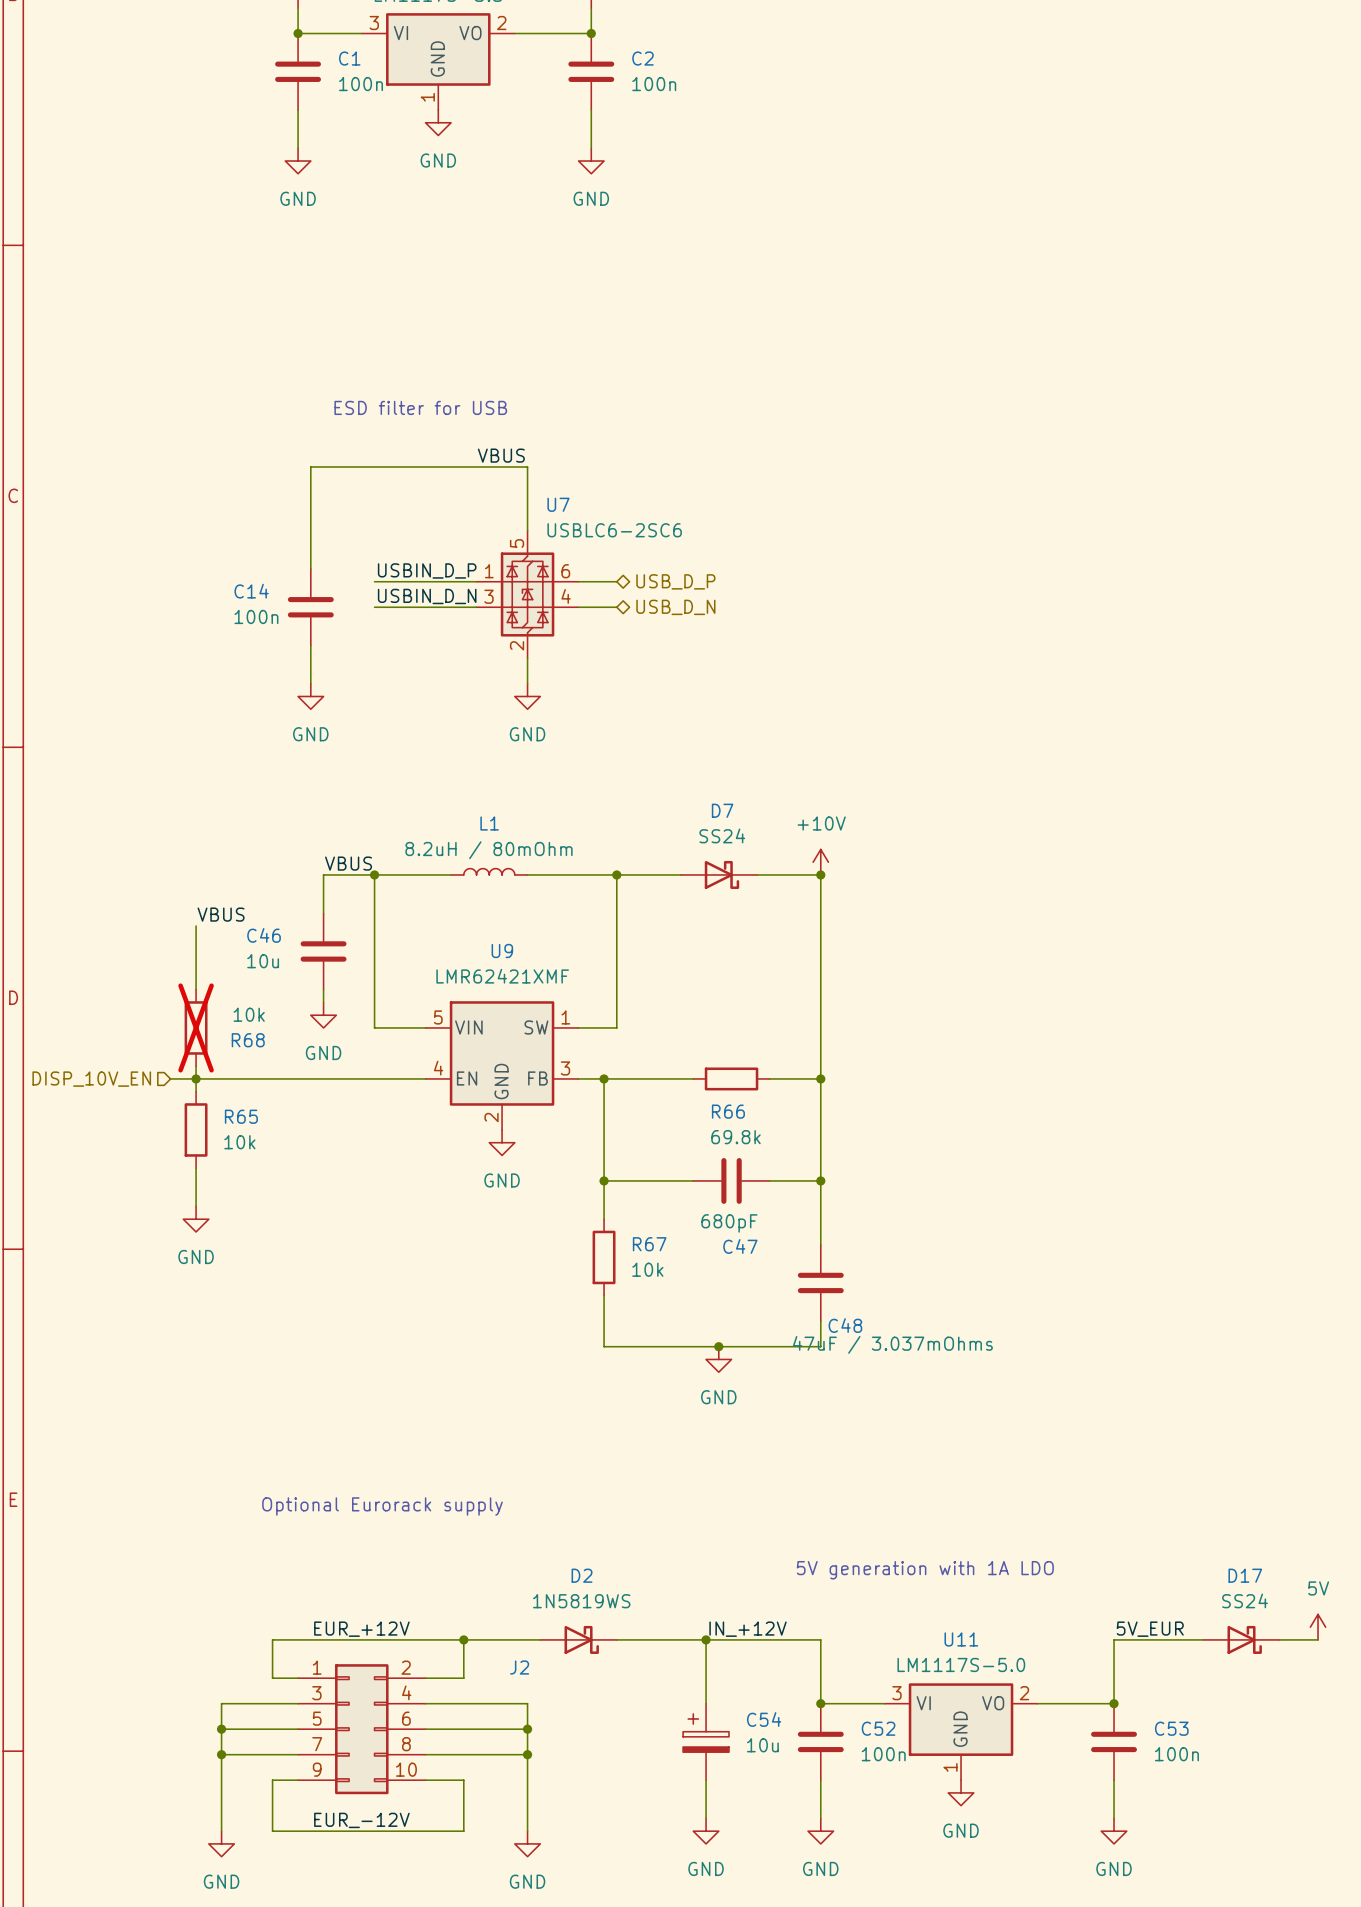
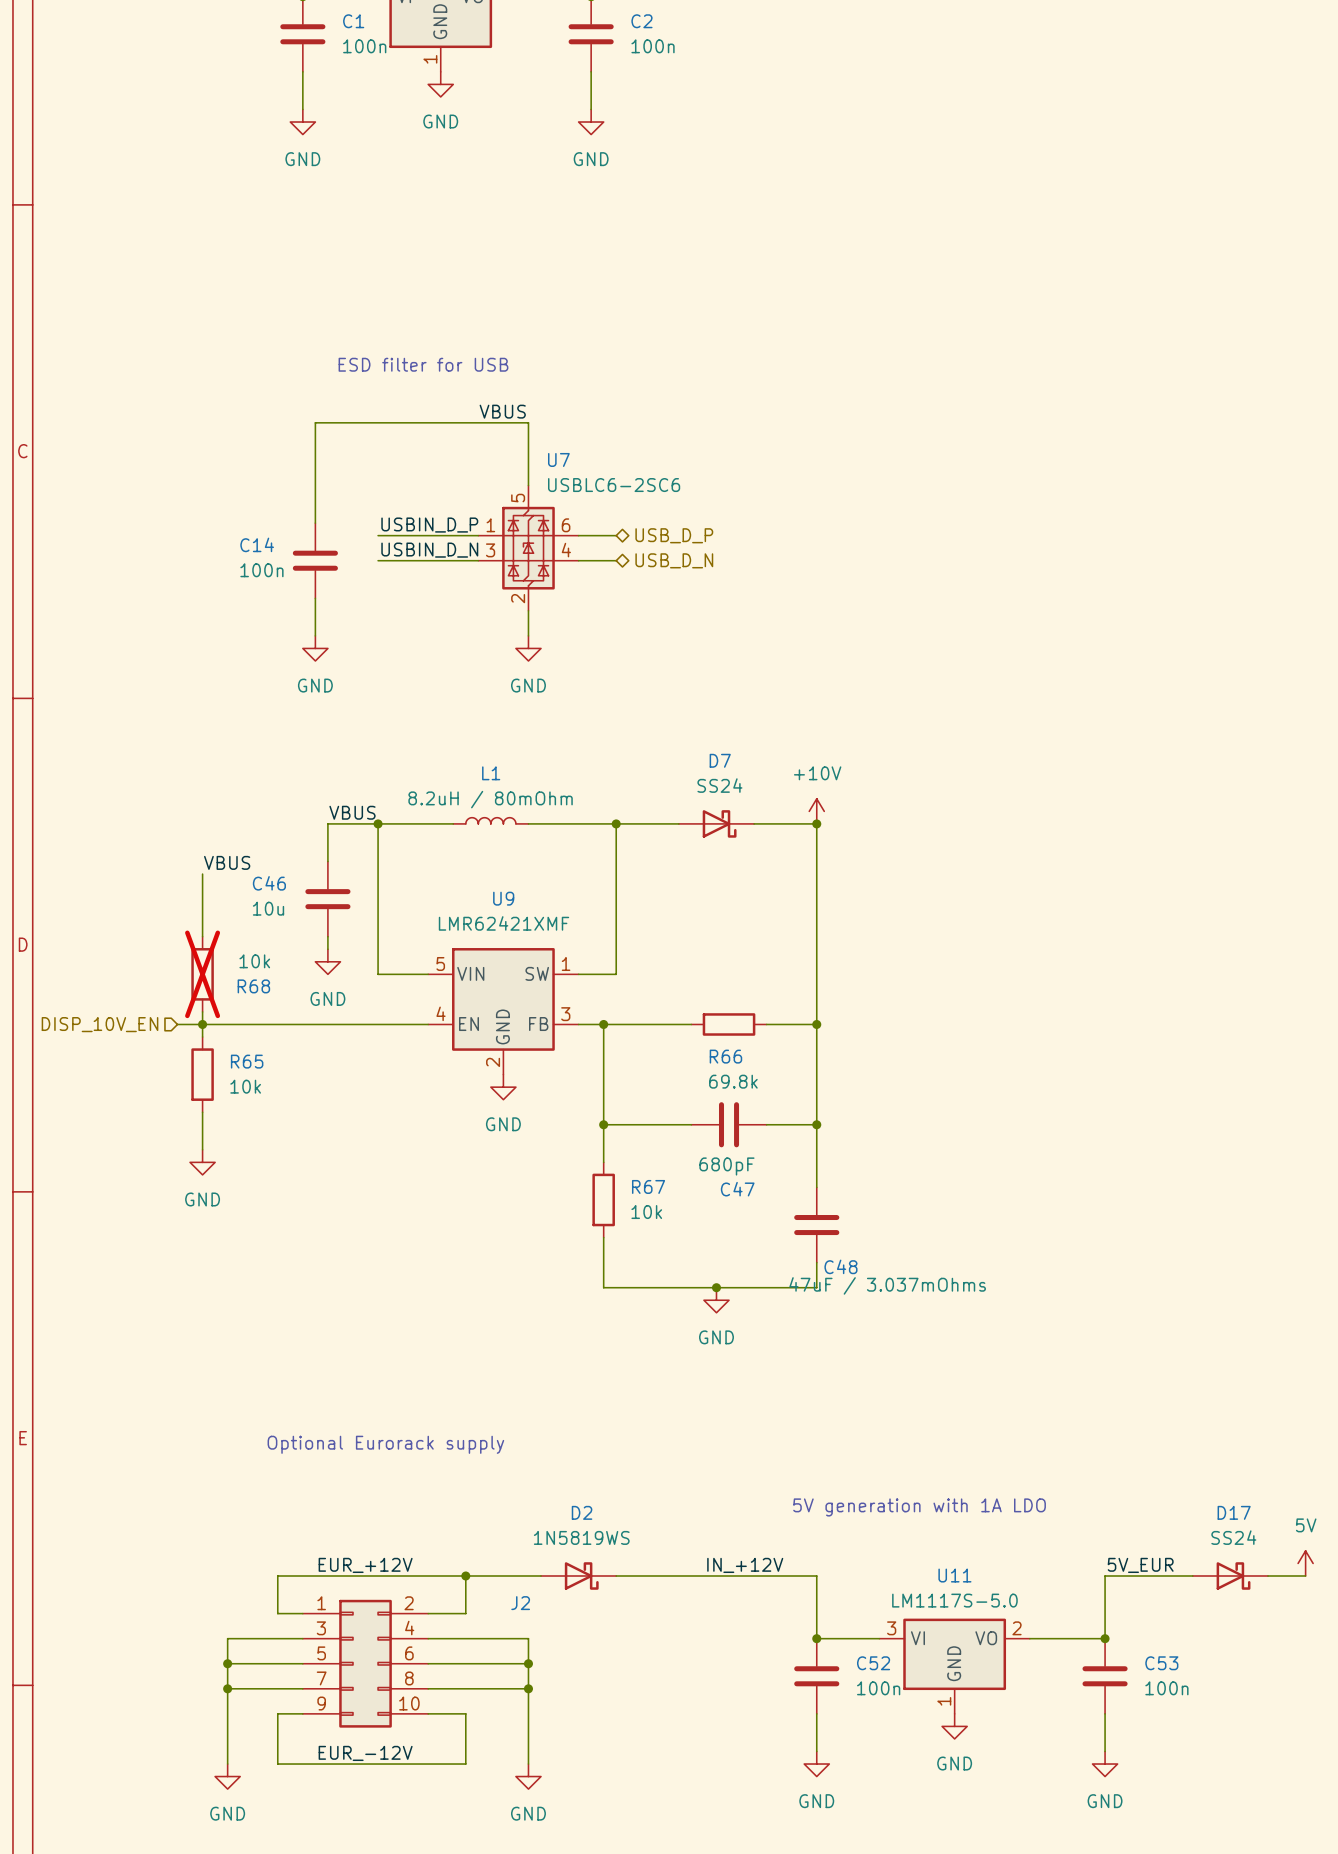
wire: (706, 1639) (706, 1703) -> none
junction: (706, 1639) -> none
C54: 10u (706, 1741) -> none
wire: (706, 1780) (706, 1818) -> none
power symbol: GND (706, 1831) -> none

